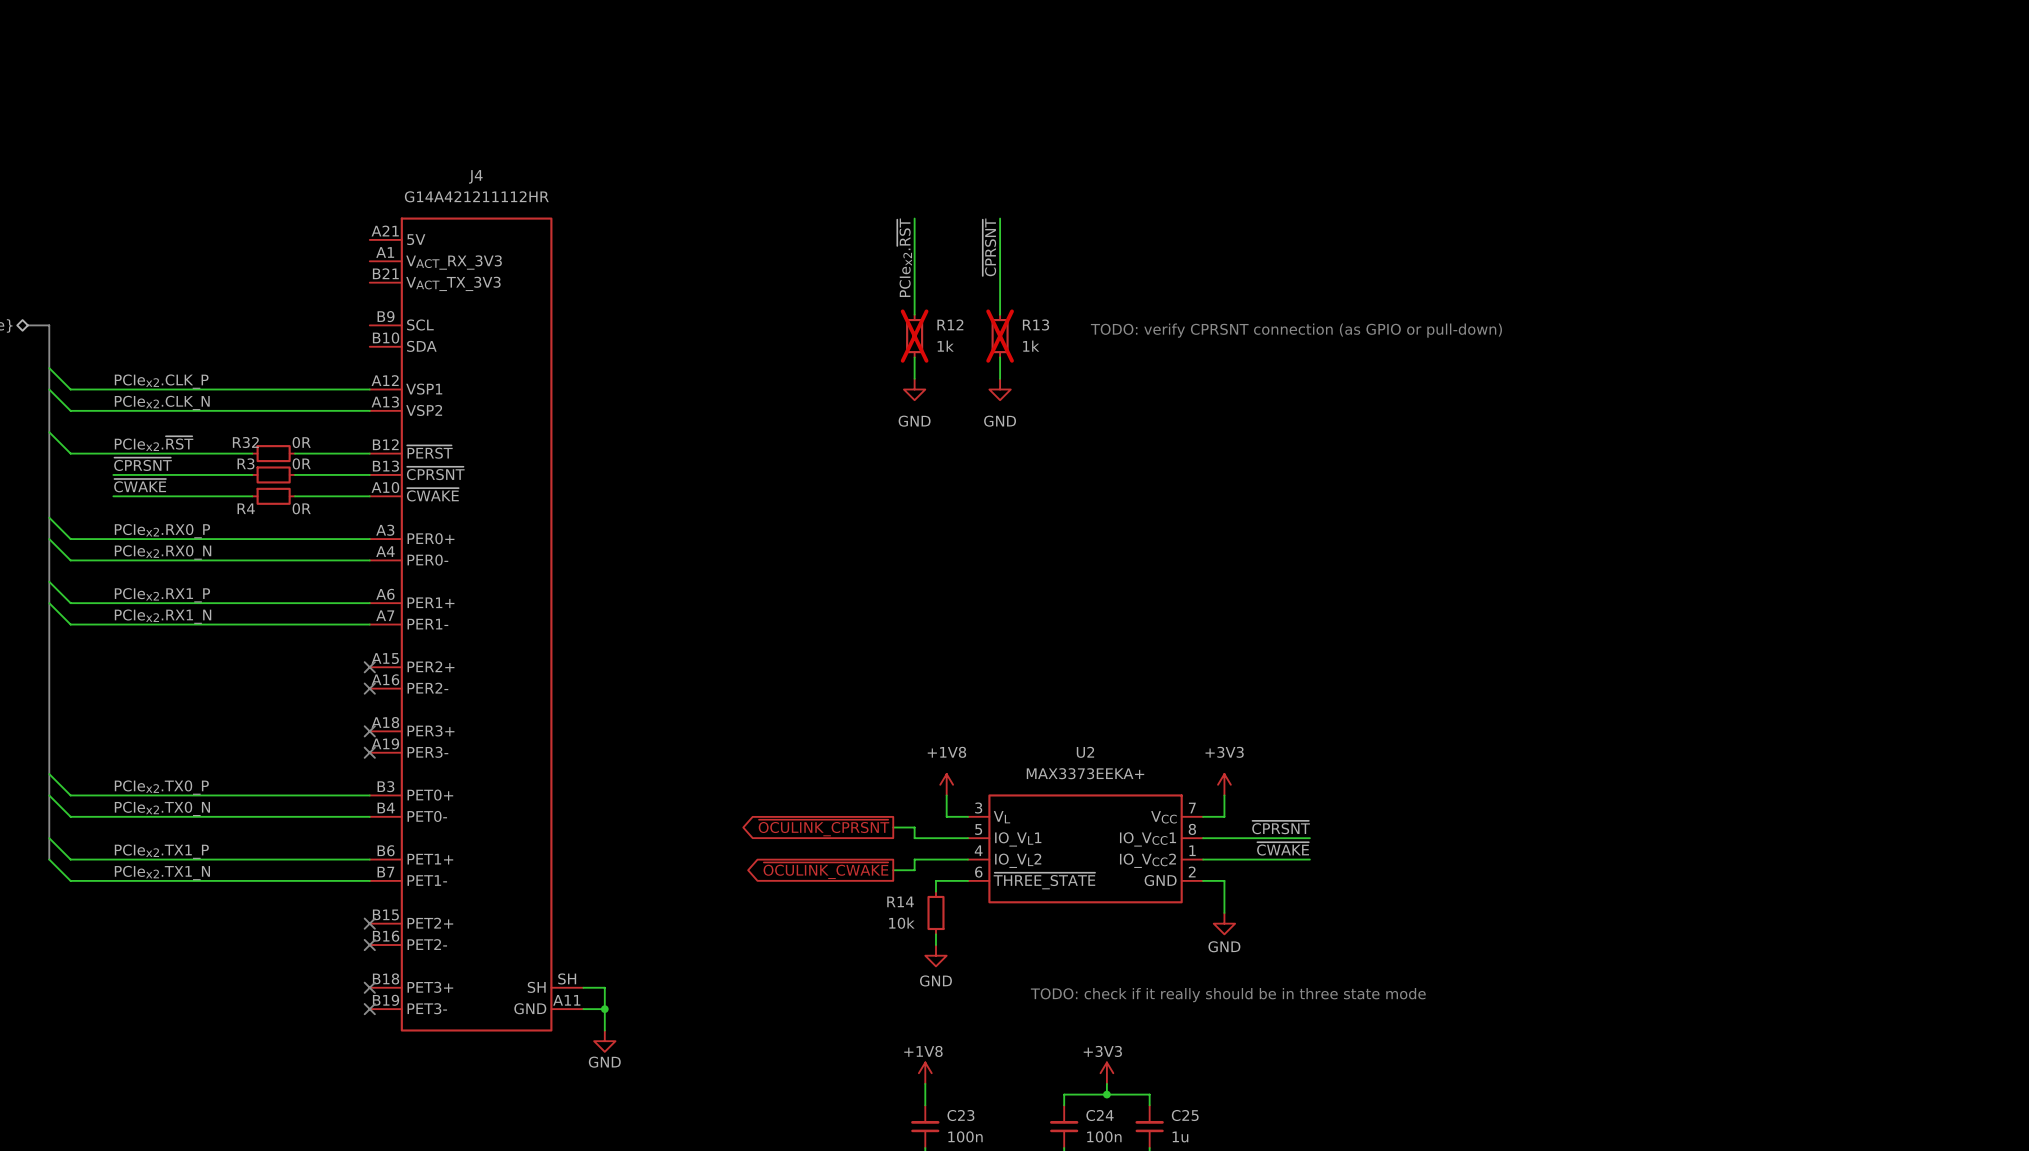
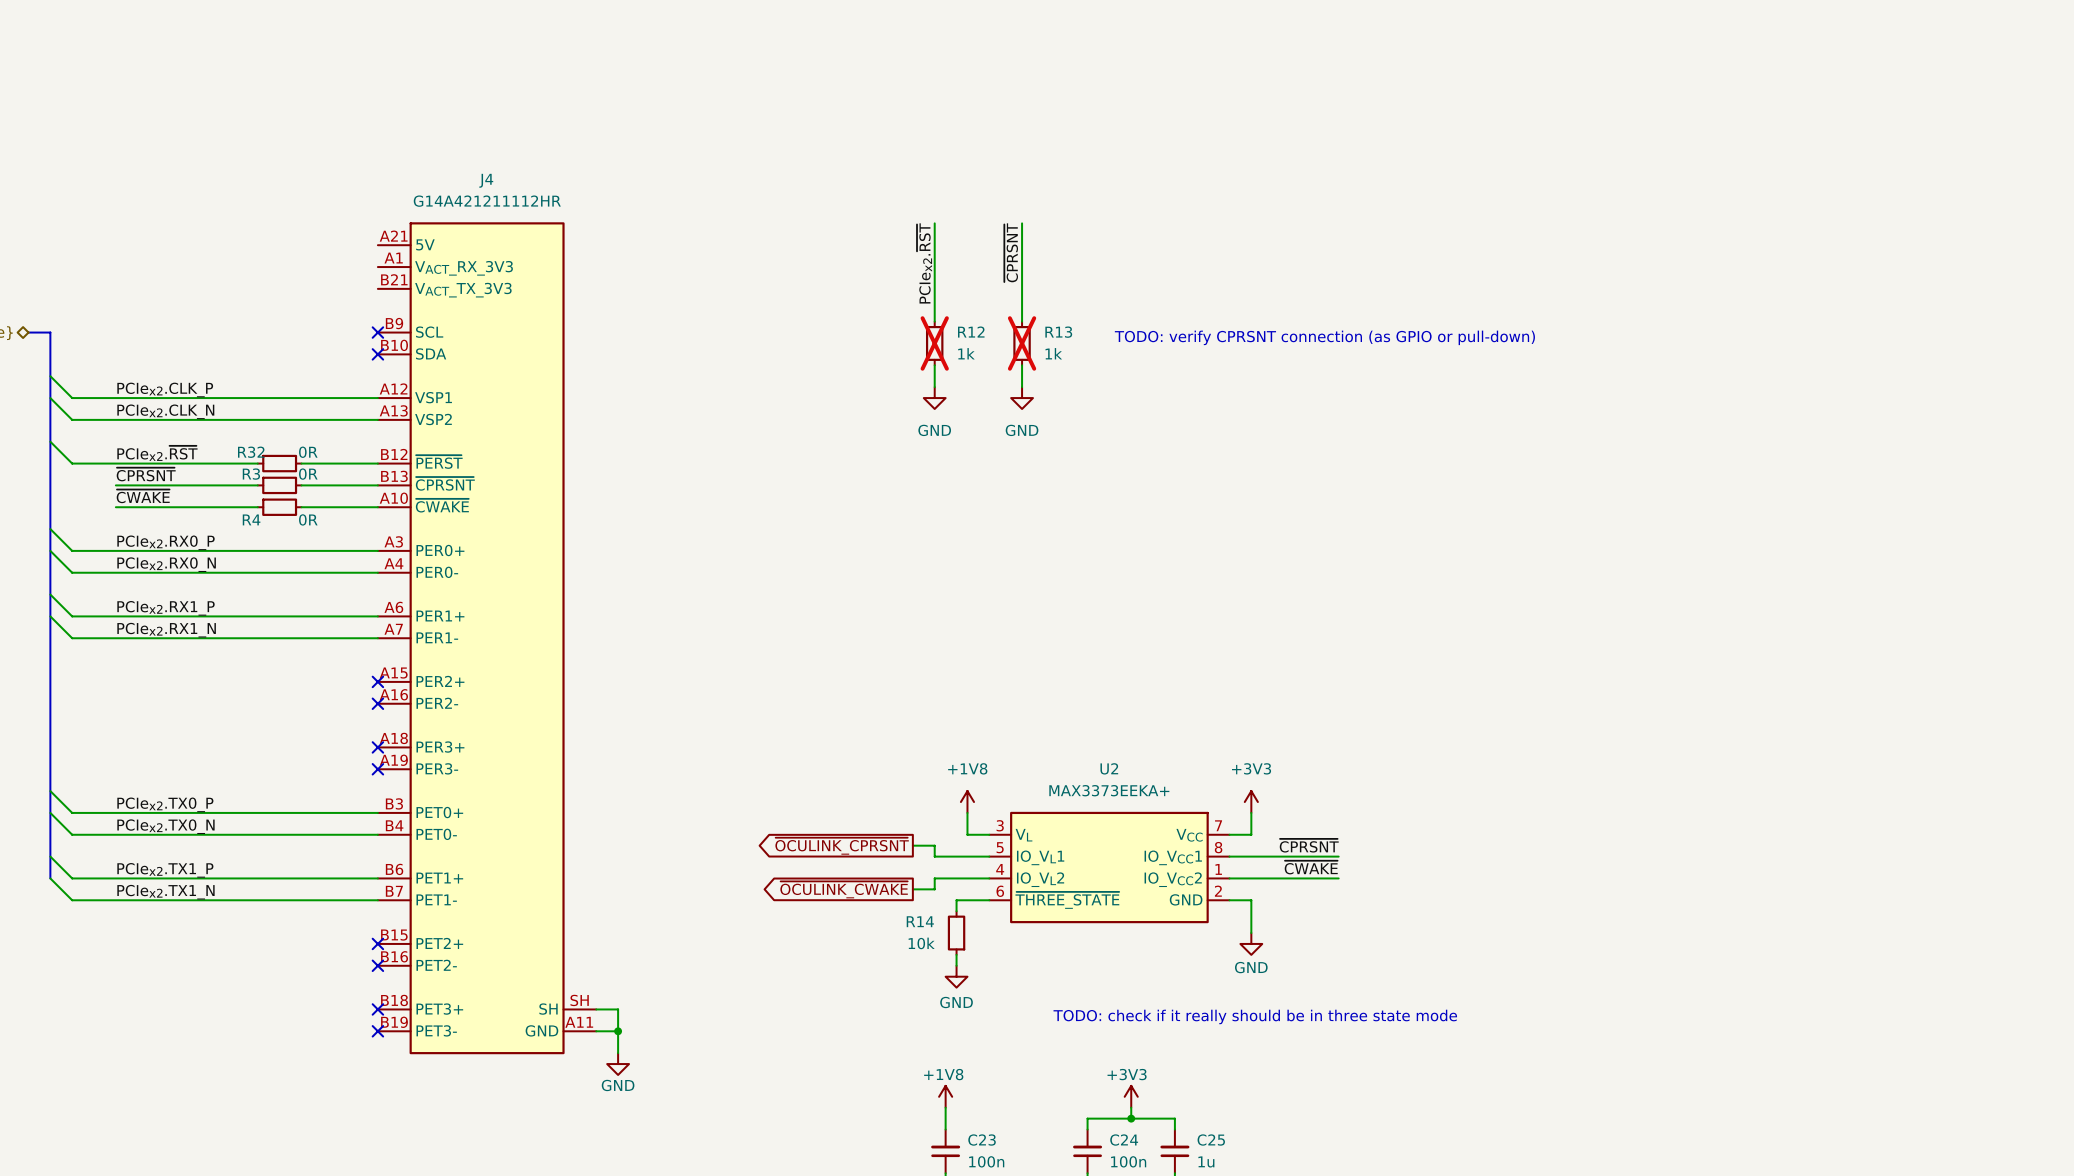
no-connect mark: none -> (377, 332)
no-connect mark: none -> (377, 354)

